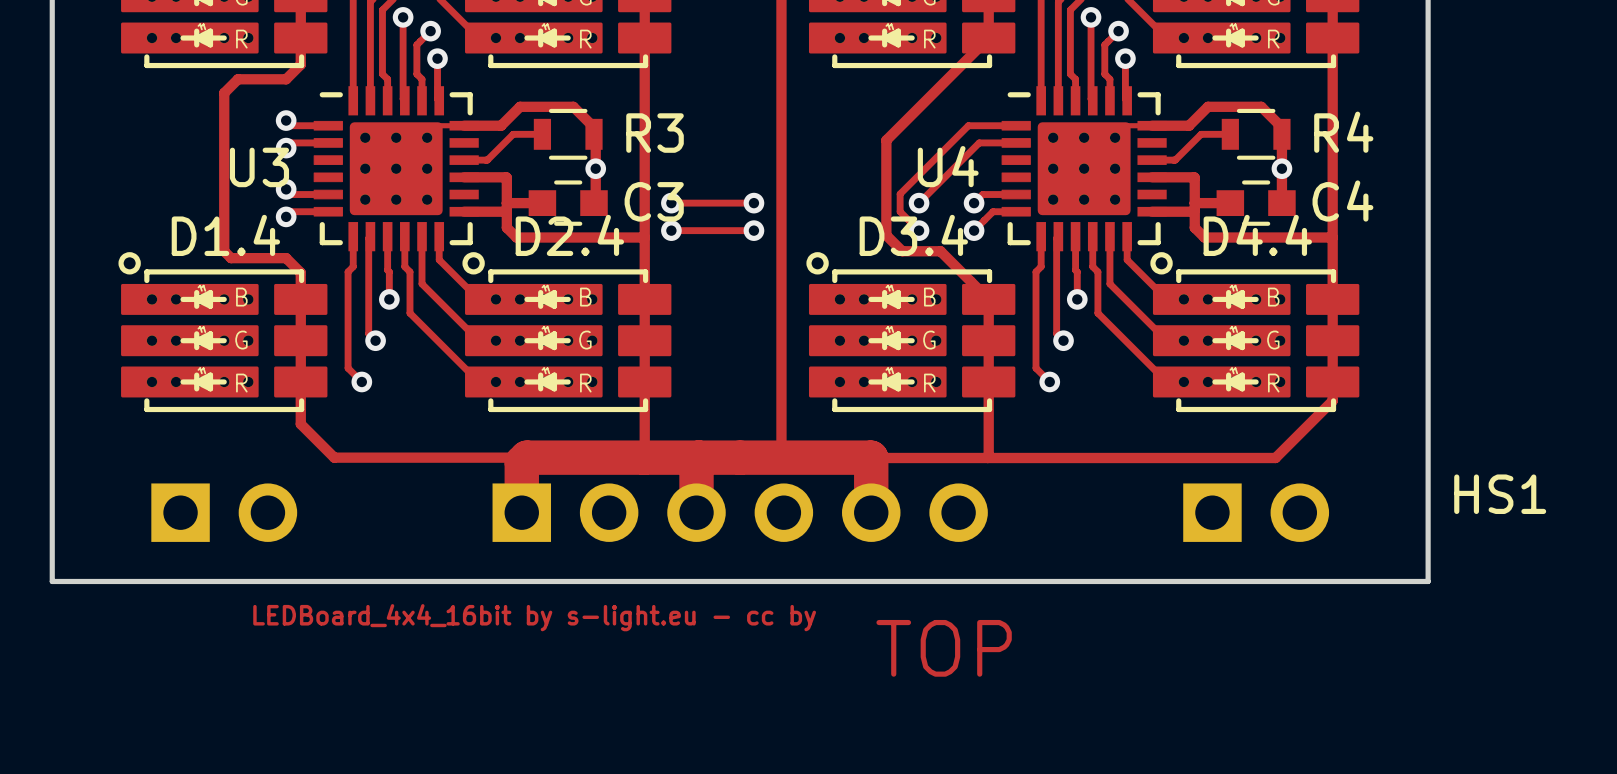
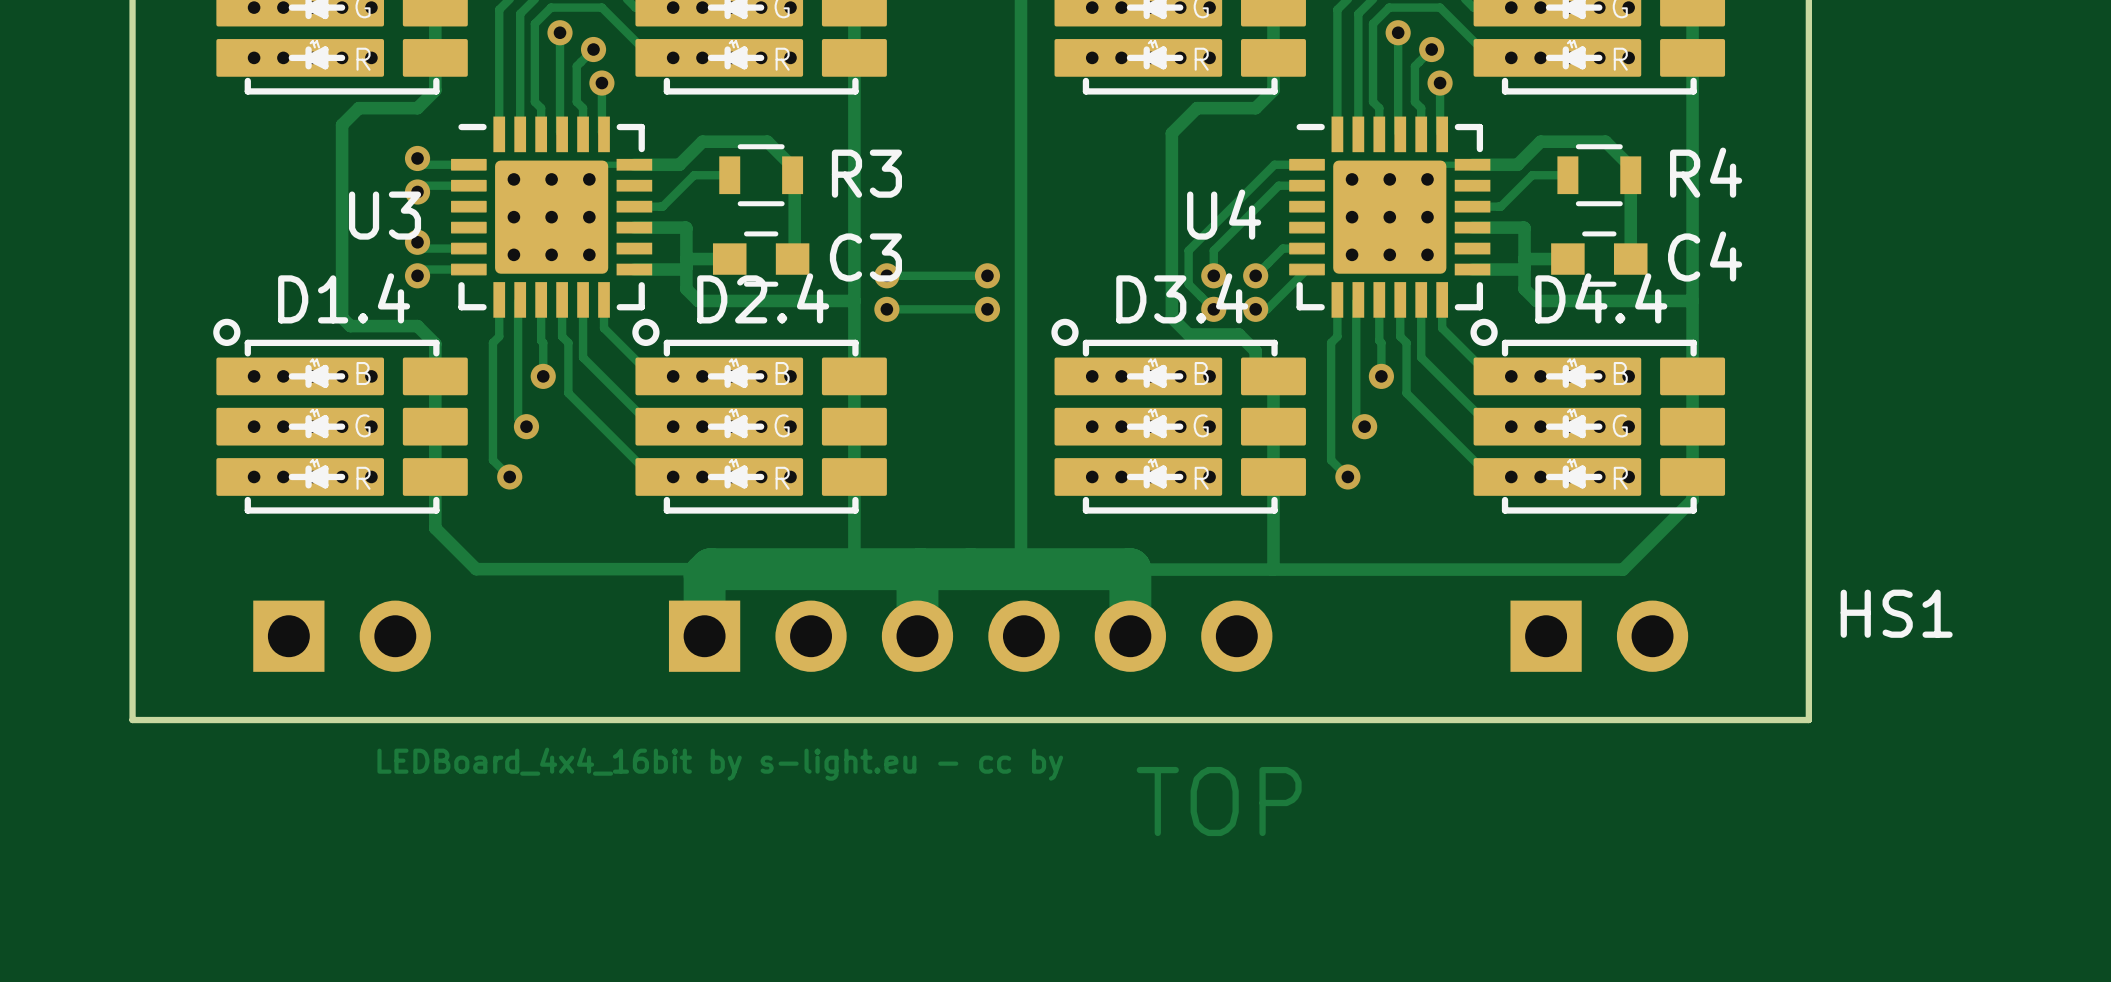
track: (988, 38) (886, 140) (886, 235) (902, 251) (940, 251) (988, 299) -> (1273, 57) (1273, 90) (1255, 108) (1197, 108) (1171, 133) (1171, 317) (1188, 334) (1238, 334) (1255, 351) (1255, 368) (1247, 376) (1273, 376)
track: (989, 125) (968, 125) (900, 194) (900, 211) (919, 230) -> (1274, 164) (1188, 250) (1188, 284) (1213, 309)
track: (993, 142) (979, 142) (919, 203) -> (1278, 185) (1213, 250) (1213, 275)
via: (595, 168) -> none
via: (1281, 168) -> none
track: (996, 194) (982, 194) (974, 203) -> (1282, 248) (1255, 275)
track: (671, 203) (753, 203) -> (886, 275) (987, 275)
via: (671, 203) -> none
via: (753, 203) -> none
via: (919, 203) -> none
via: (974, 203) -> none
track: (1016, 211) (993, 211) (974, 230) -> (1307, 269) (1267, 309) (1255, 309)
via: none -> (886, 275)
via: none -> (987, 275)
via: none -> (1213, 275)
via: none -> (1255, 275)
track: (671, 230) (753, 230) -> (886, 309) (987, 309)
via: (671, 230) -> none
via: (753, 230) -> none
via: (919, 230) -> none
via: (974, 230) -> none
via: none -> (886, 309)
via: none -> (987, 309)
via: none -> (1213, 309)
via: none -> (1255, 309)

